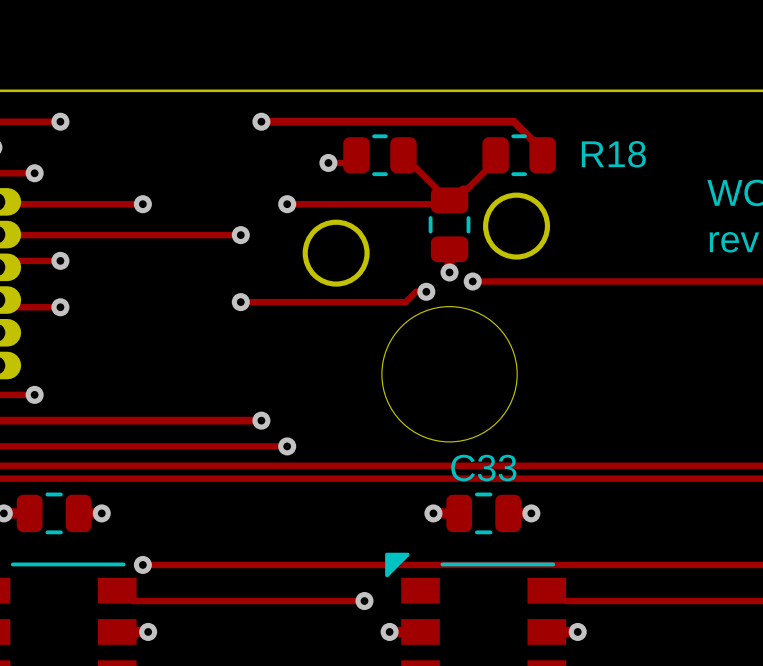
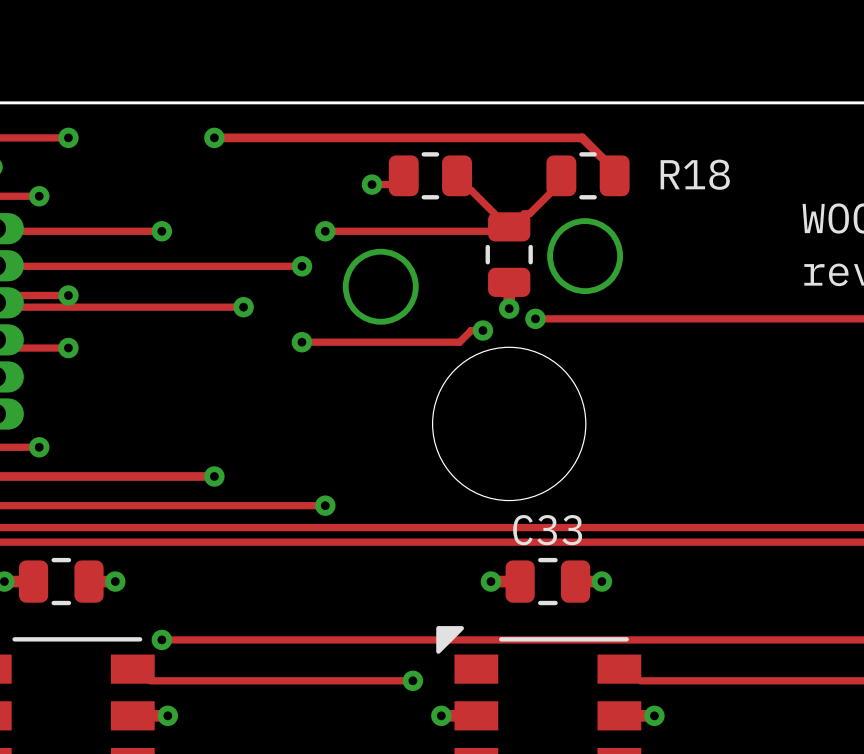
via: none -> (214, 137)
via: (261, 121) -> none
via: (240, 235) -> none
via: none -> (301, 266)
track: none -> (21, 307) (243, 307)
via: none -> (243, 307)
track: (240, 302) (266, 302) -> (272, 266) (301, 266)
via: (240, 302) -> none
via: none -> (301, 342)
track: (189, 420) (261, 420) -> (214, 137) (296, 137)
via: none -> (214, 476)
via: (261, 420) -> none

